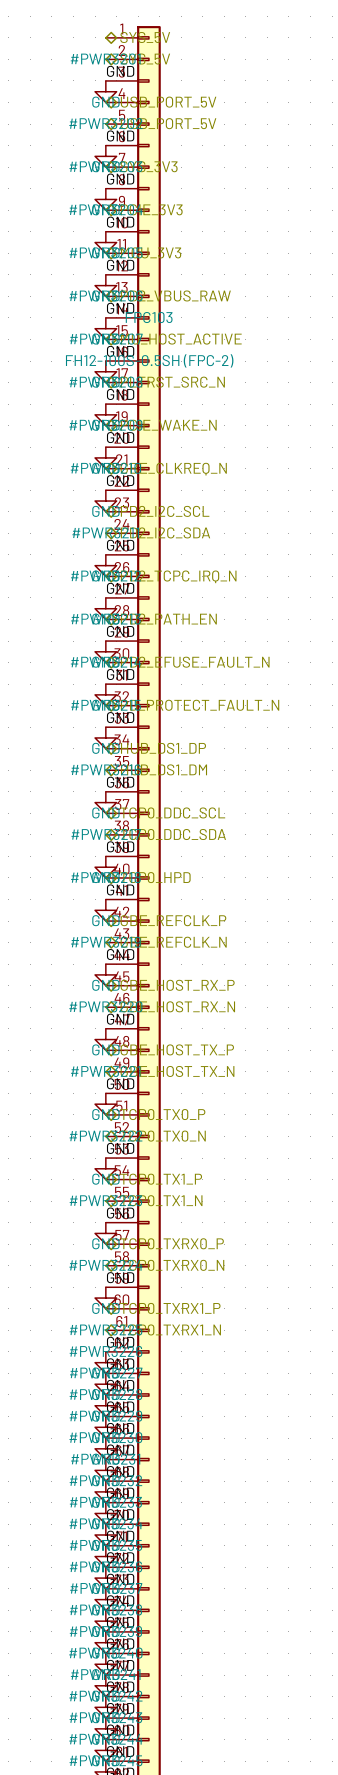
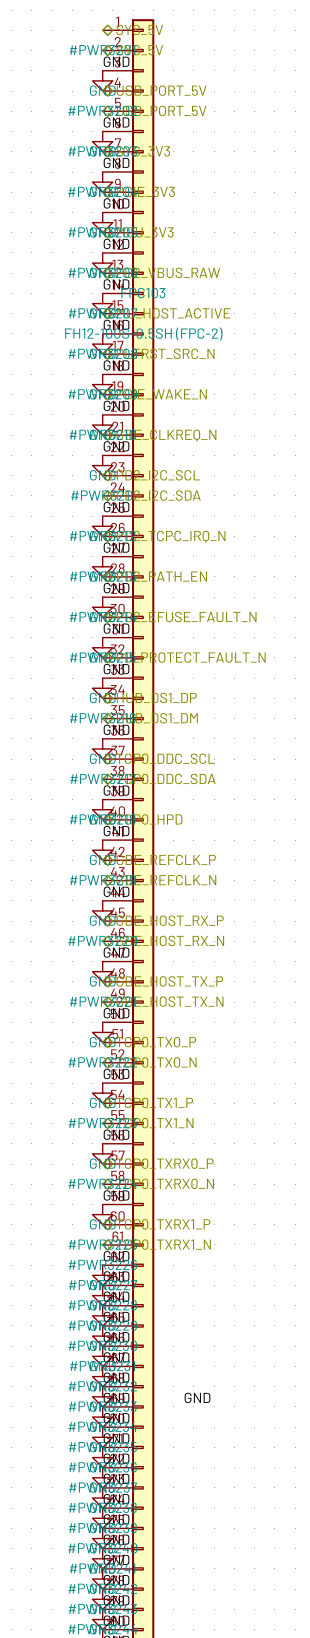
label: none -> GND (197, 1397)

